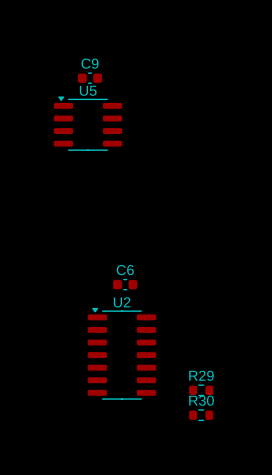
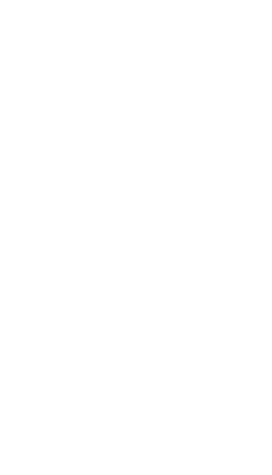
C9: (89, 78) -> none
U5: (87, 123) -> none
C6: (125, 284) -> none
U2: (121, 353) -> none
R29: (201, 390) -> none
R30: (201, 415) -> none

